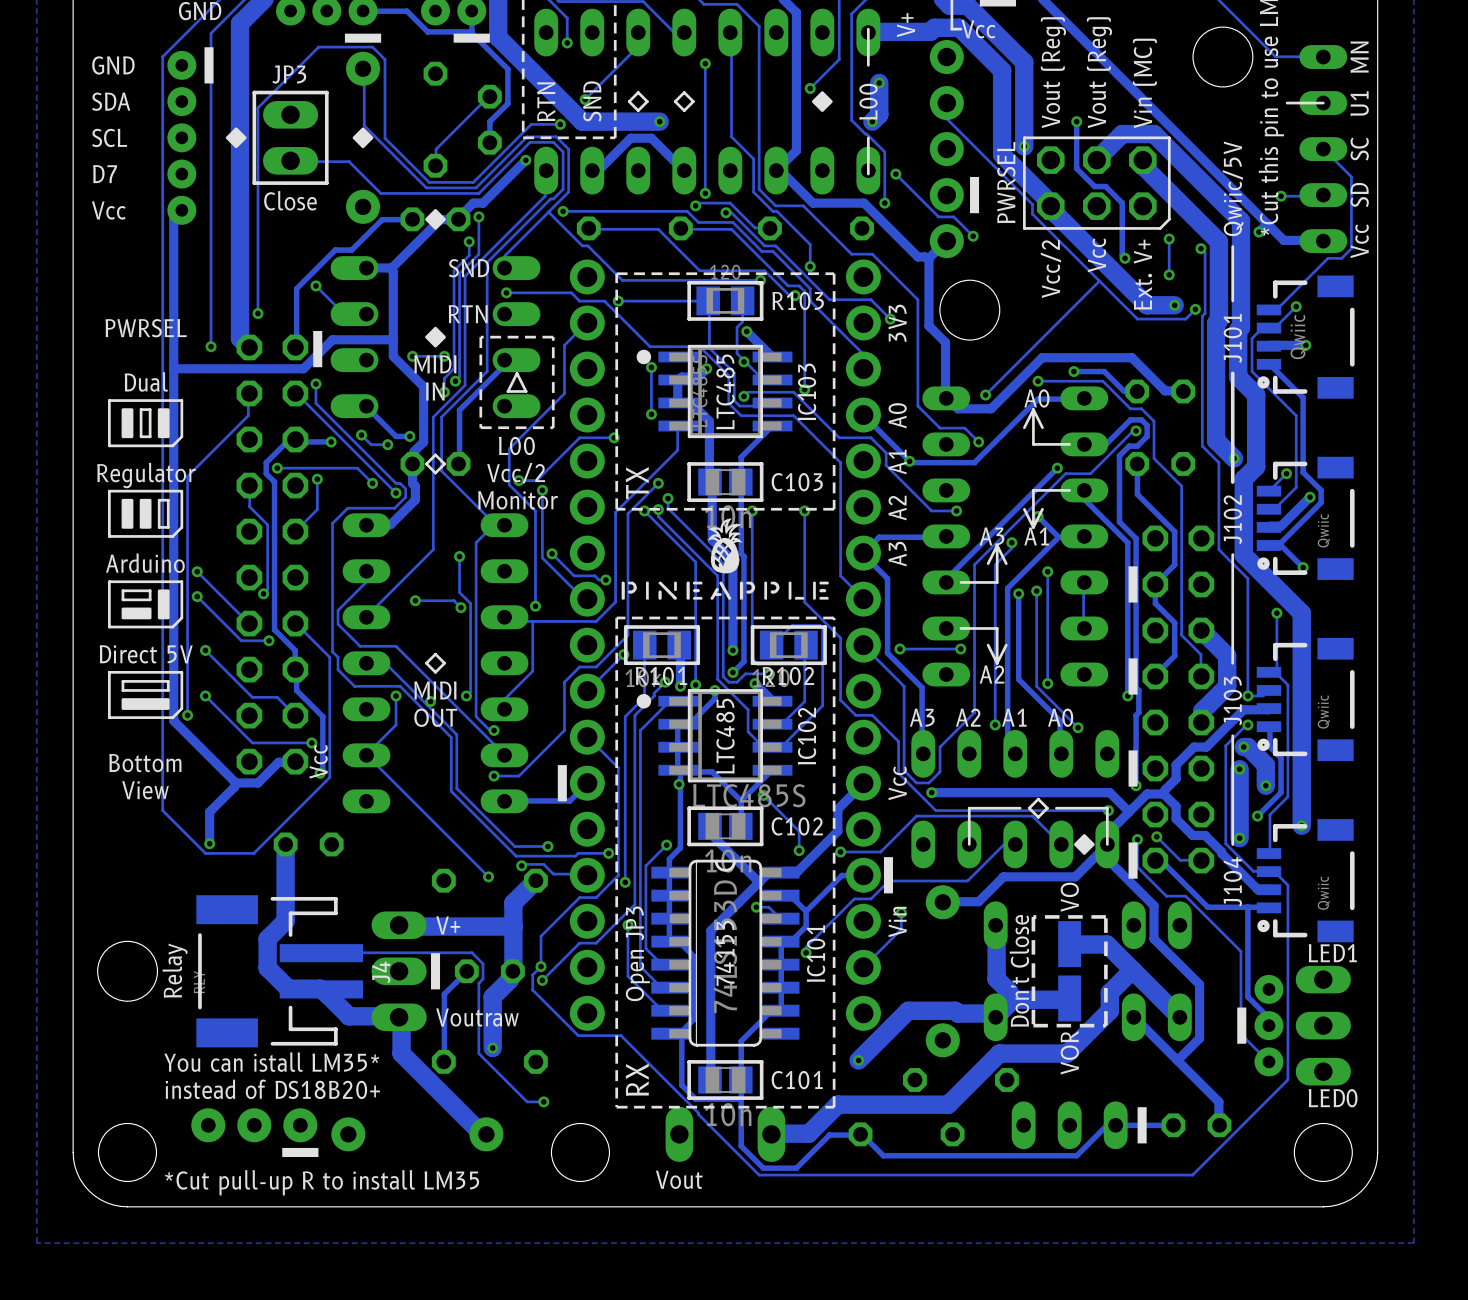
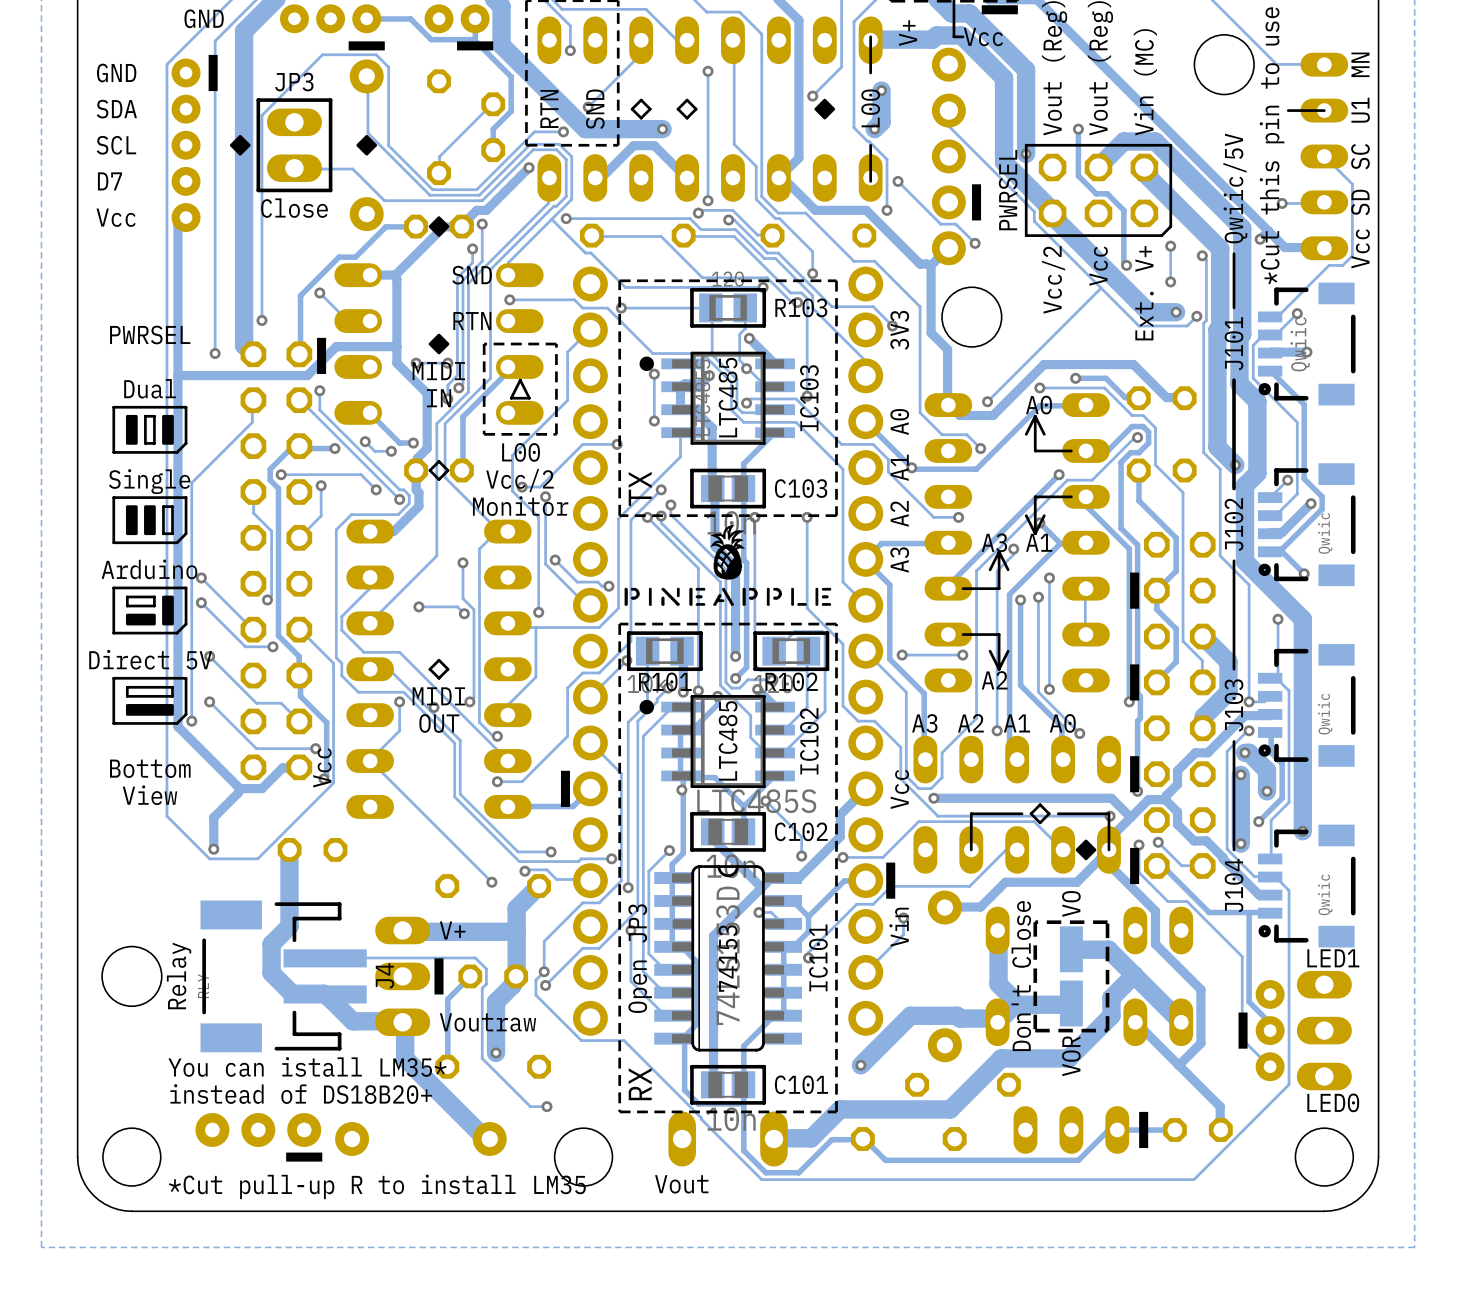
text: Regulator (146, 475) -> Single (149, 481)

